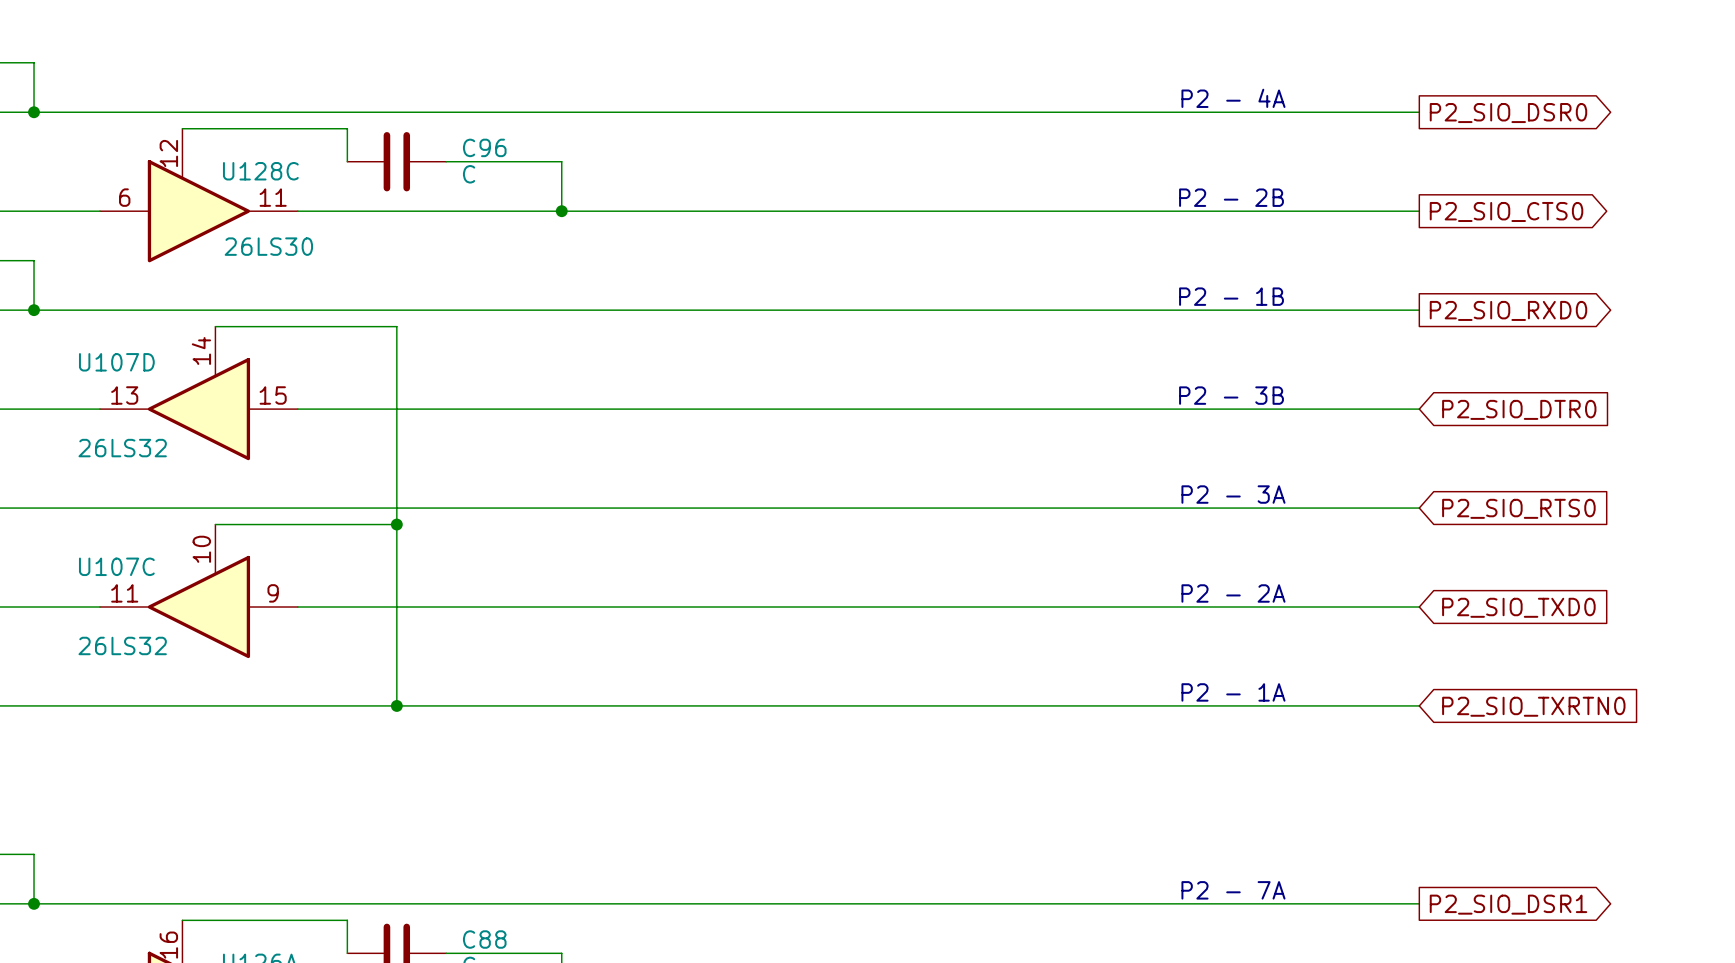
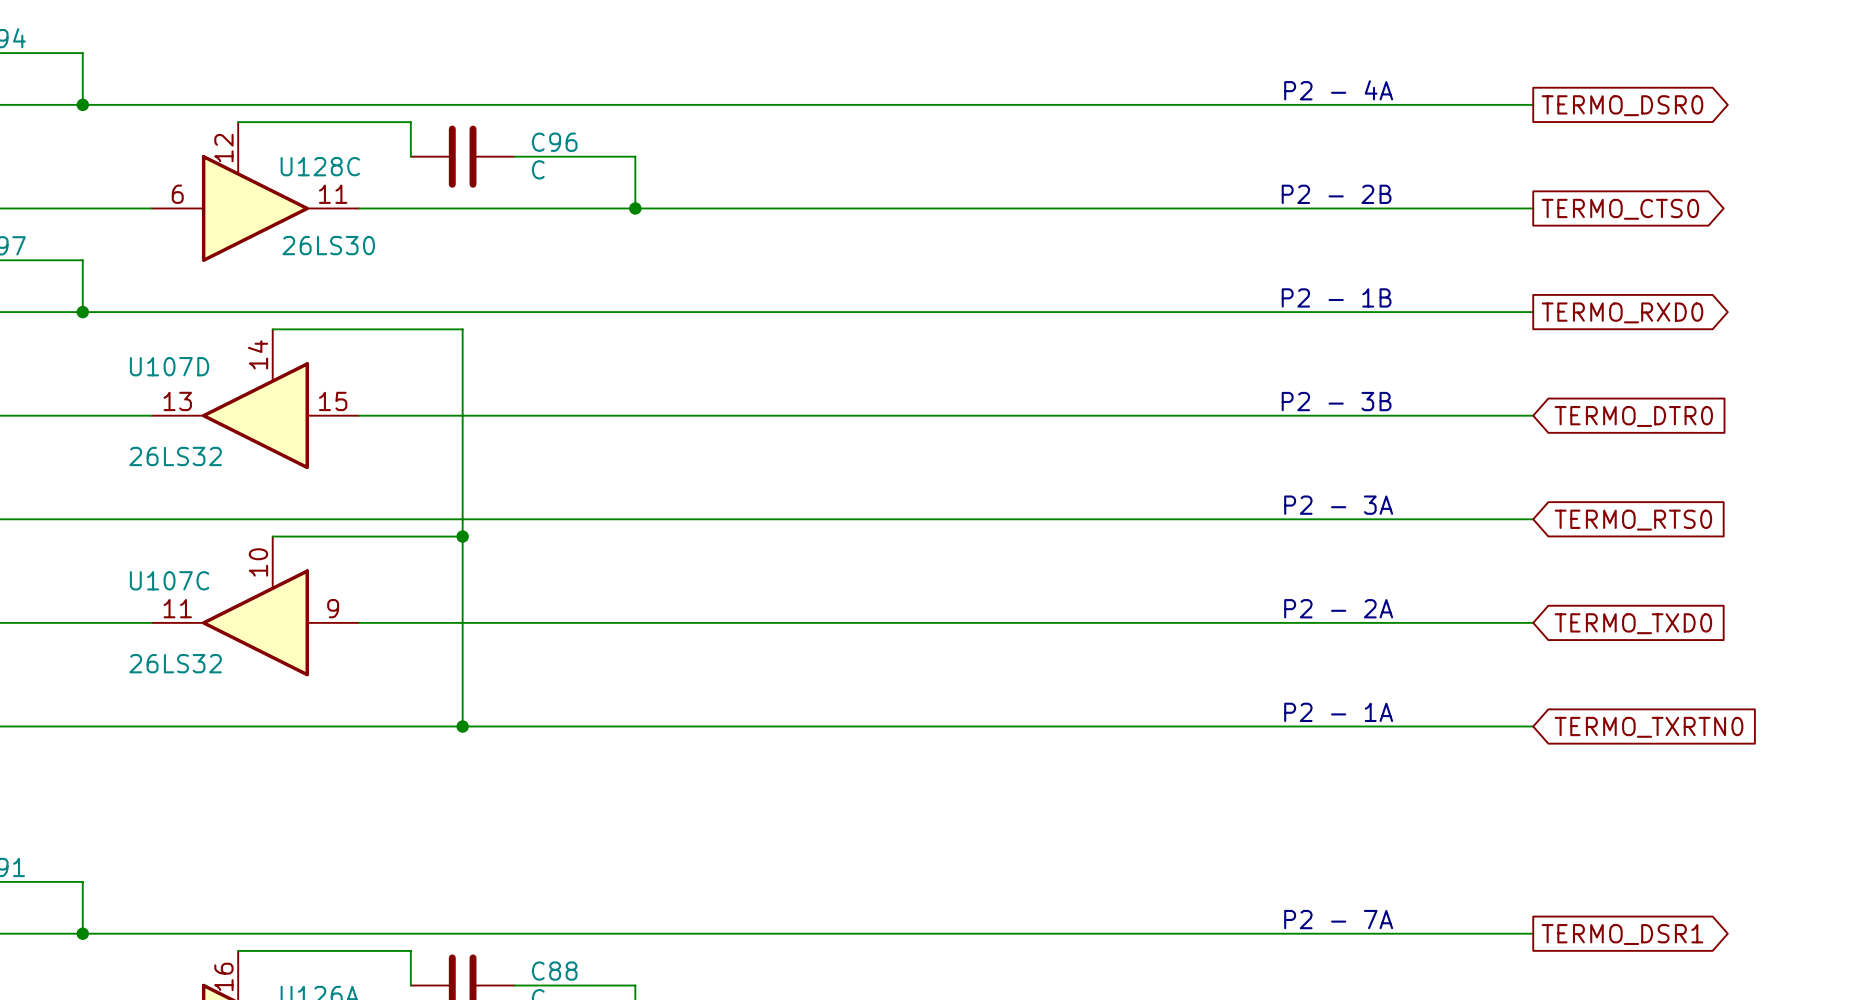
global label: P2_SIO_DSR0 (1508, 113) -> TERMO_DSR0 (1622, 105)
global label: P2_SIO_CTS0 (1506, 211) -> TERMO_CTS0 (1620, 209)
global label: P2_SIO_RXD0 (1508, 310) -> TERMO_RXD0 (1622, 312)
global label: P2_SIO_DTR0 (1519, 409) -> TERMO_DTR0 (1633, 416)
global label: P2_SIO_RTS0 (1518, 508) -> TERMO_RTS0 (1633, 520)
global label: P2_SIO_TXD0 (1518, 607) -> TERMO_TXD0 (1633, 623)
global label: P2_SIO_TXRTN0 (1533, 706) -> TERMO_TXRTN0 (1648, 727)
global label: P2_SIO_DSR1 (1508, 904) -> TERMO_DSR1 (1622, 934)

